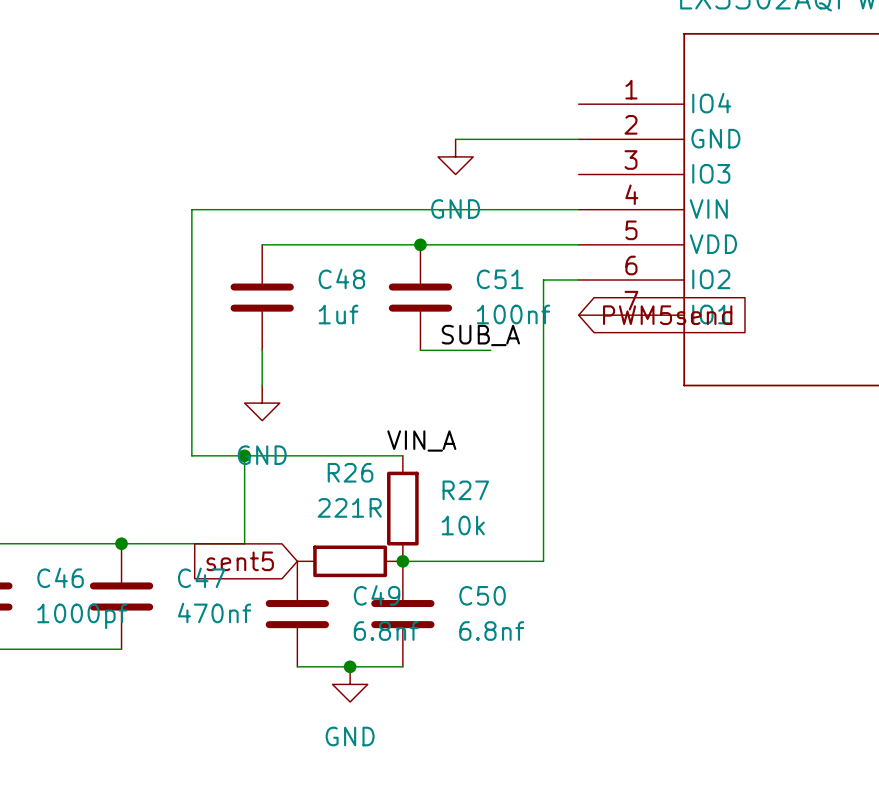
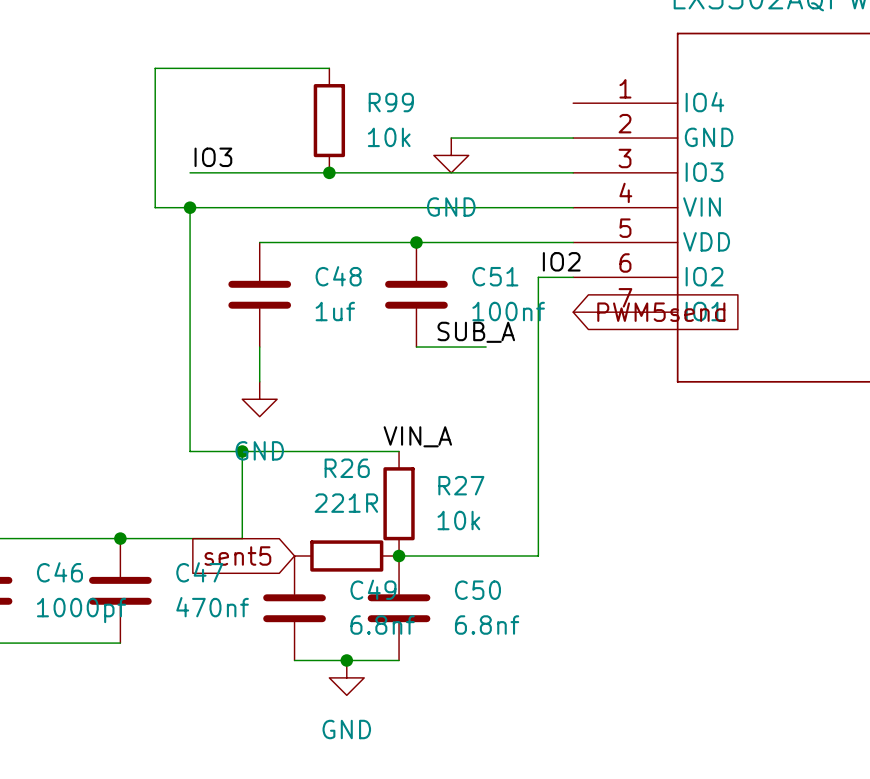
wire: none -> (329, 68) (155, 68) (155, 207) (190, 207)
R99: none -> 10k (329, 120)
label: none -> IO3 (213, 157)
wire: none -> (190, 172) (573, 172)
junction: none -> (329, 172)
junction: none -> (190, 207)
label: none -> IO2 (561, 261)

